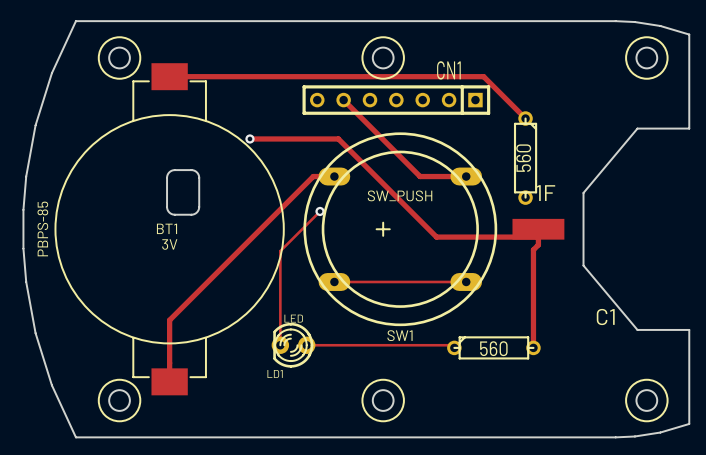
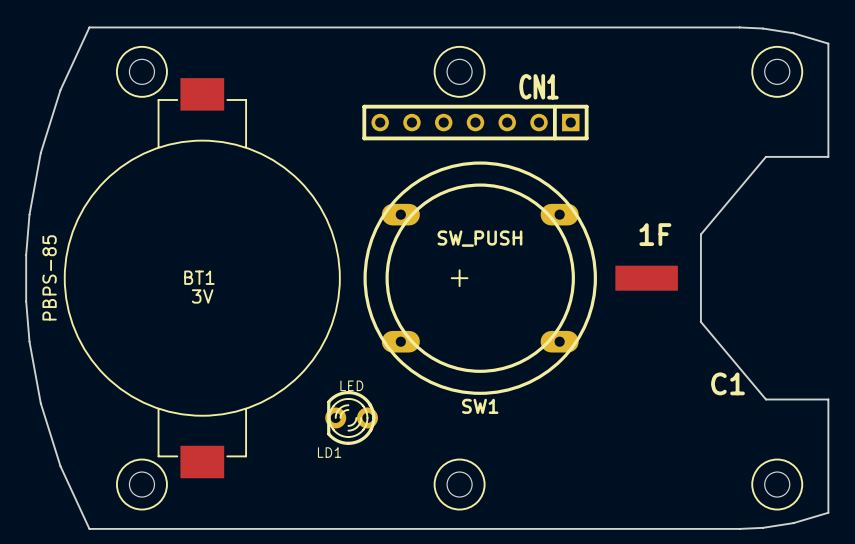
track: (169, 76) (483, 76) (525, 118) -> none
track: (343, 100) (420, 176) (466, 176) -> none
track: (249, 138) (338, 138) (436, 237) (538, 237) -> none
via: (249, 138) -> none
part: 560 (525, 158) -> none
track: (334, 176) (313, 176) (169, 320) (169, 381) -> none
part: (183, 192) -> none
track: (320, 211) (280, 251) (280, 345) -> none
via: (320, 211) -> none
track: (538, 229) (538, 244) (533, 249) (533, 347) -> none
track: (334, 281) (466, 281) -> none
track: (306, 345) (451, 345) (454, 347) -> none
part: 560 (493, 347) -> none

